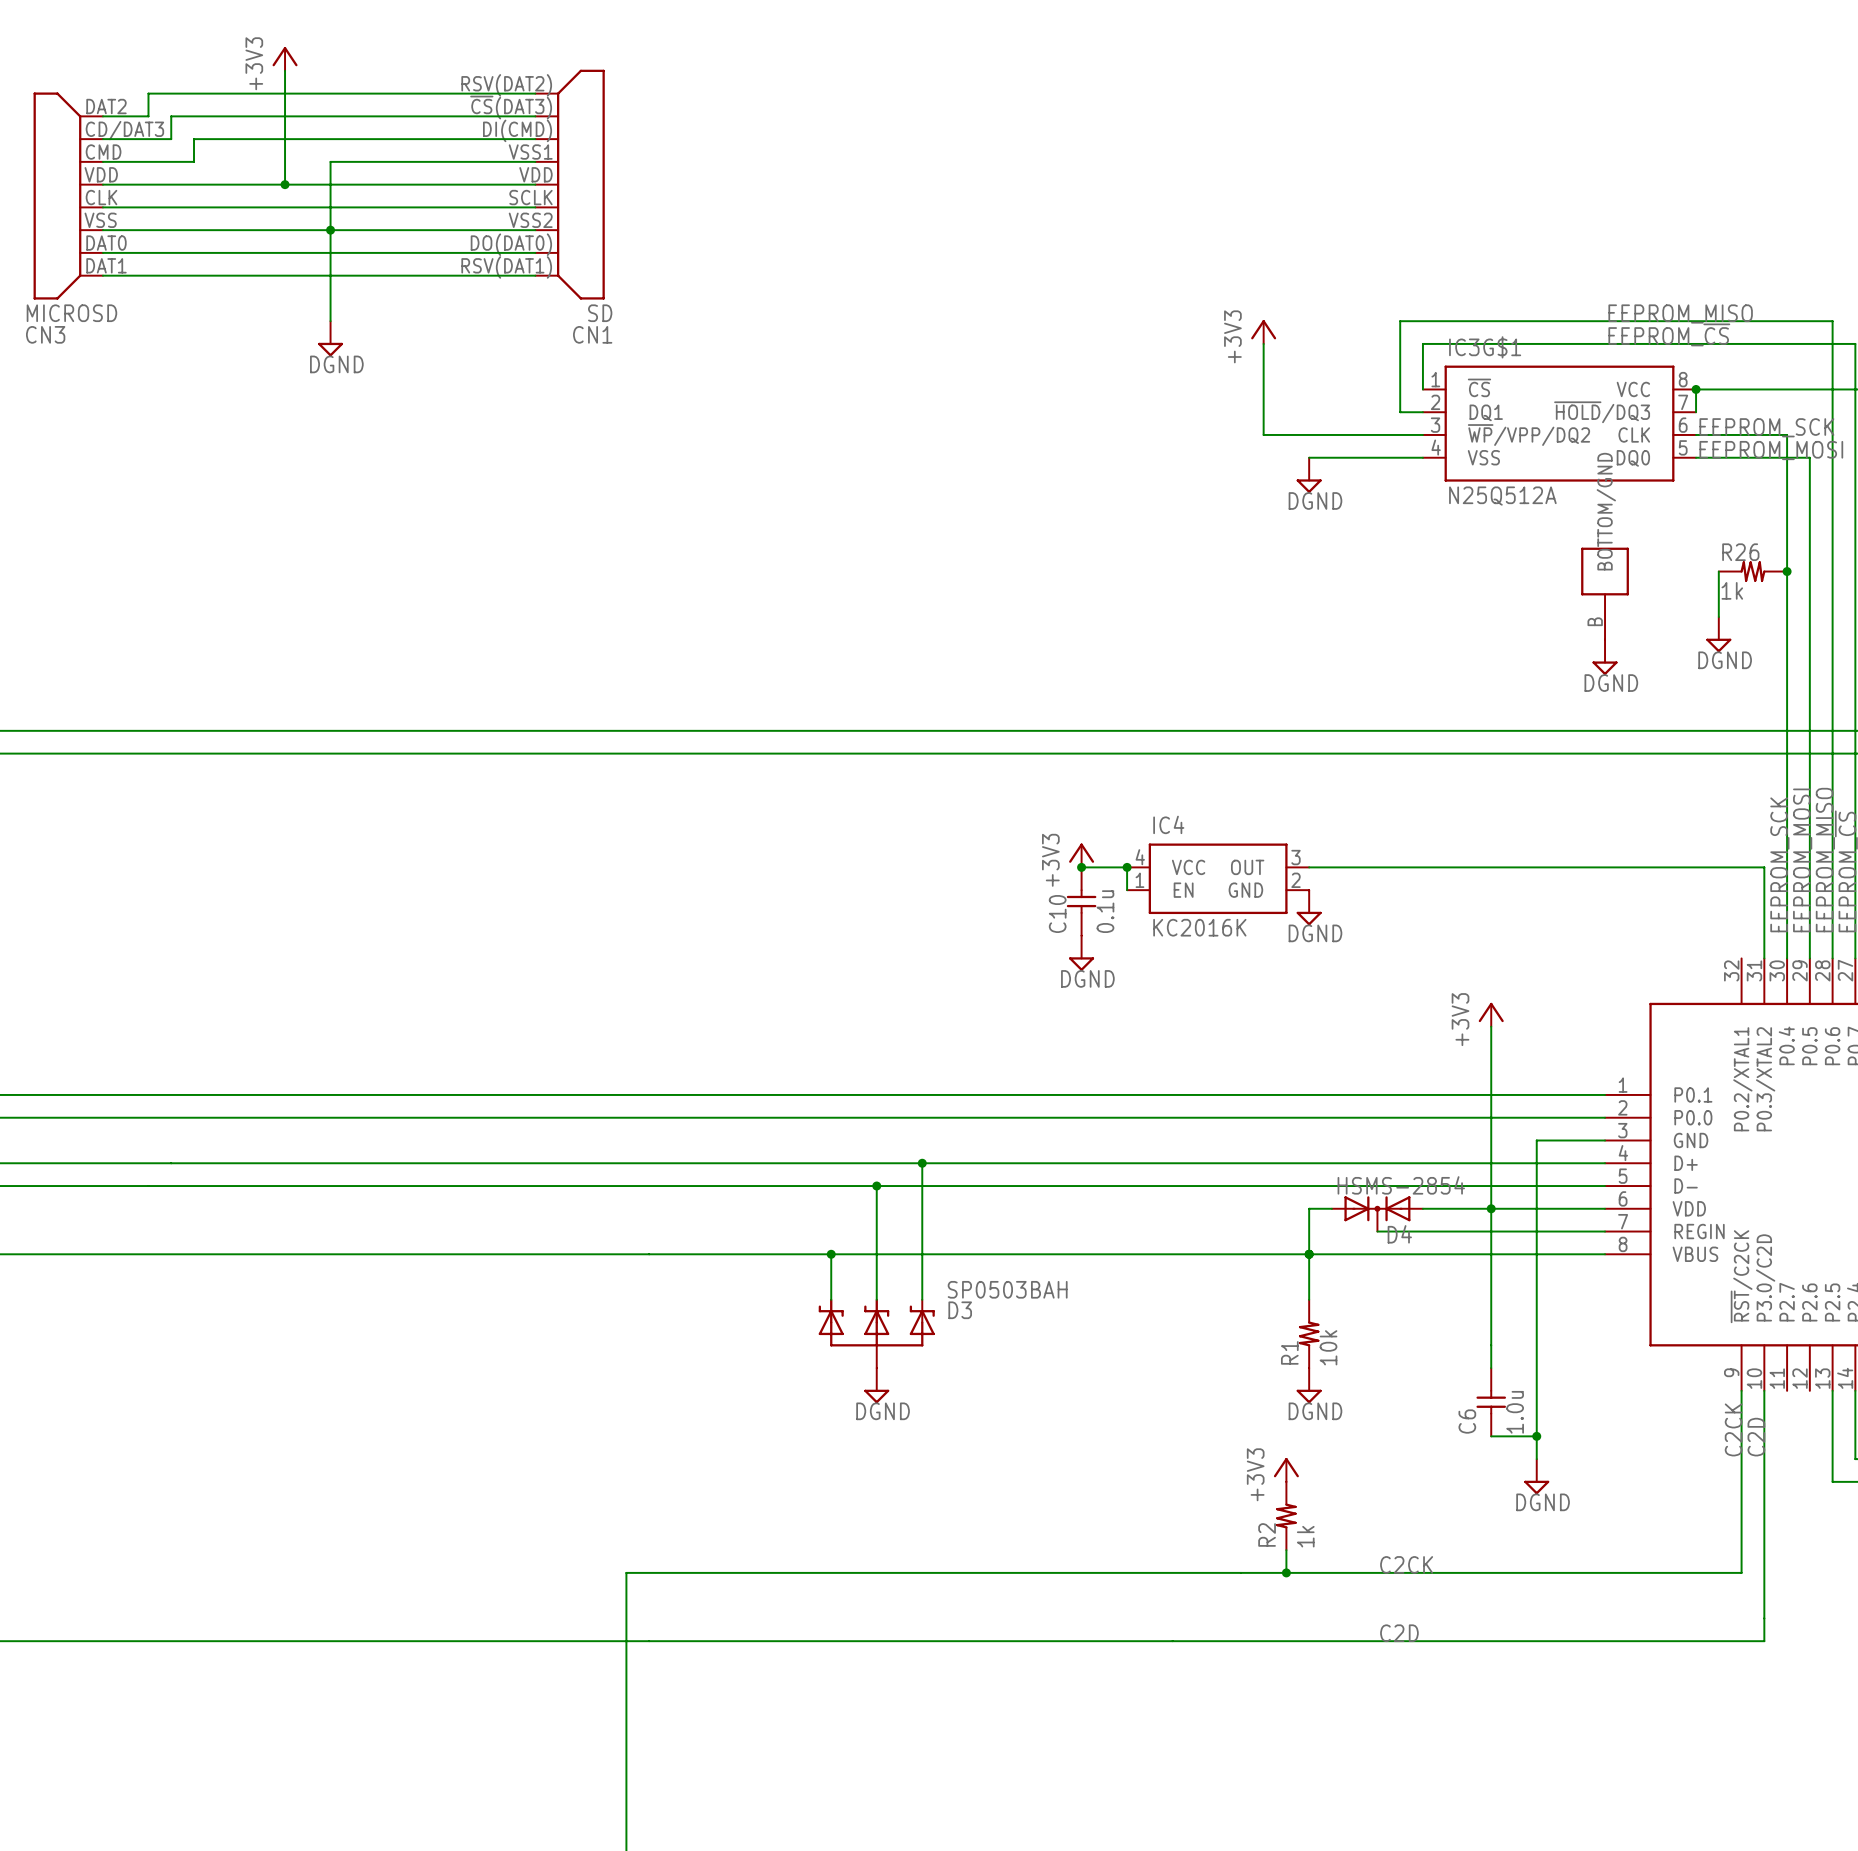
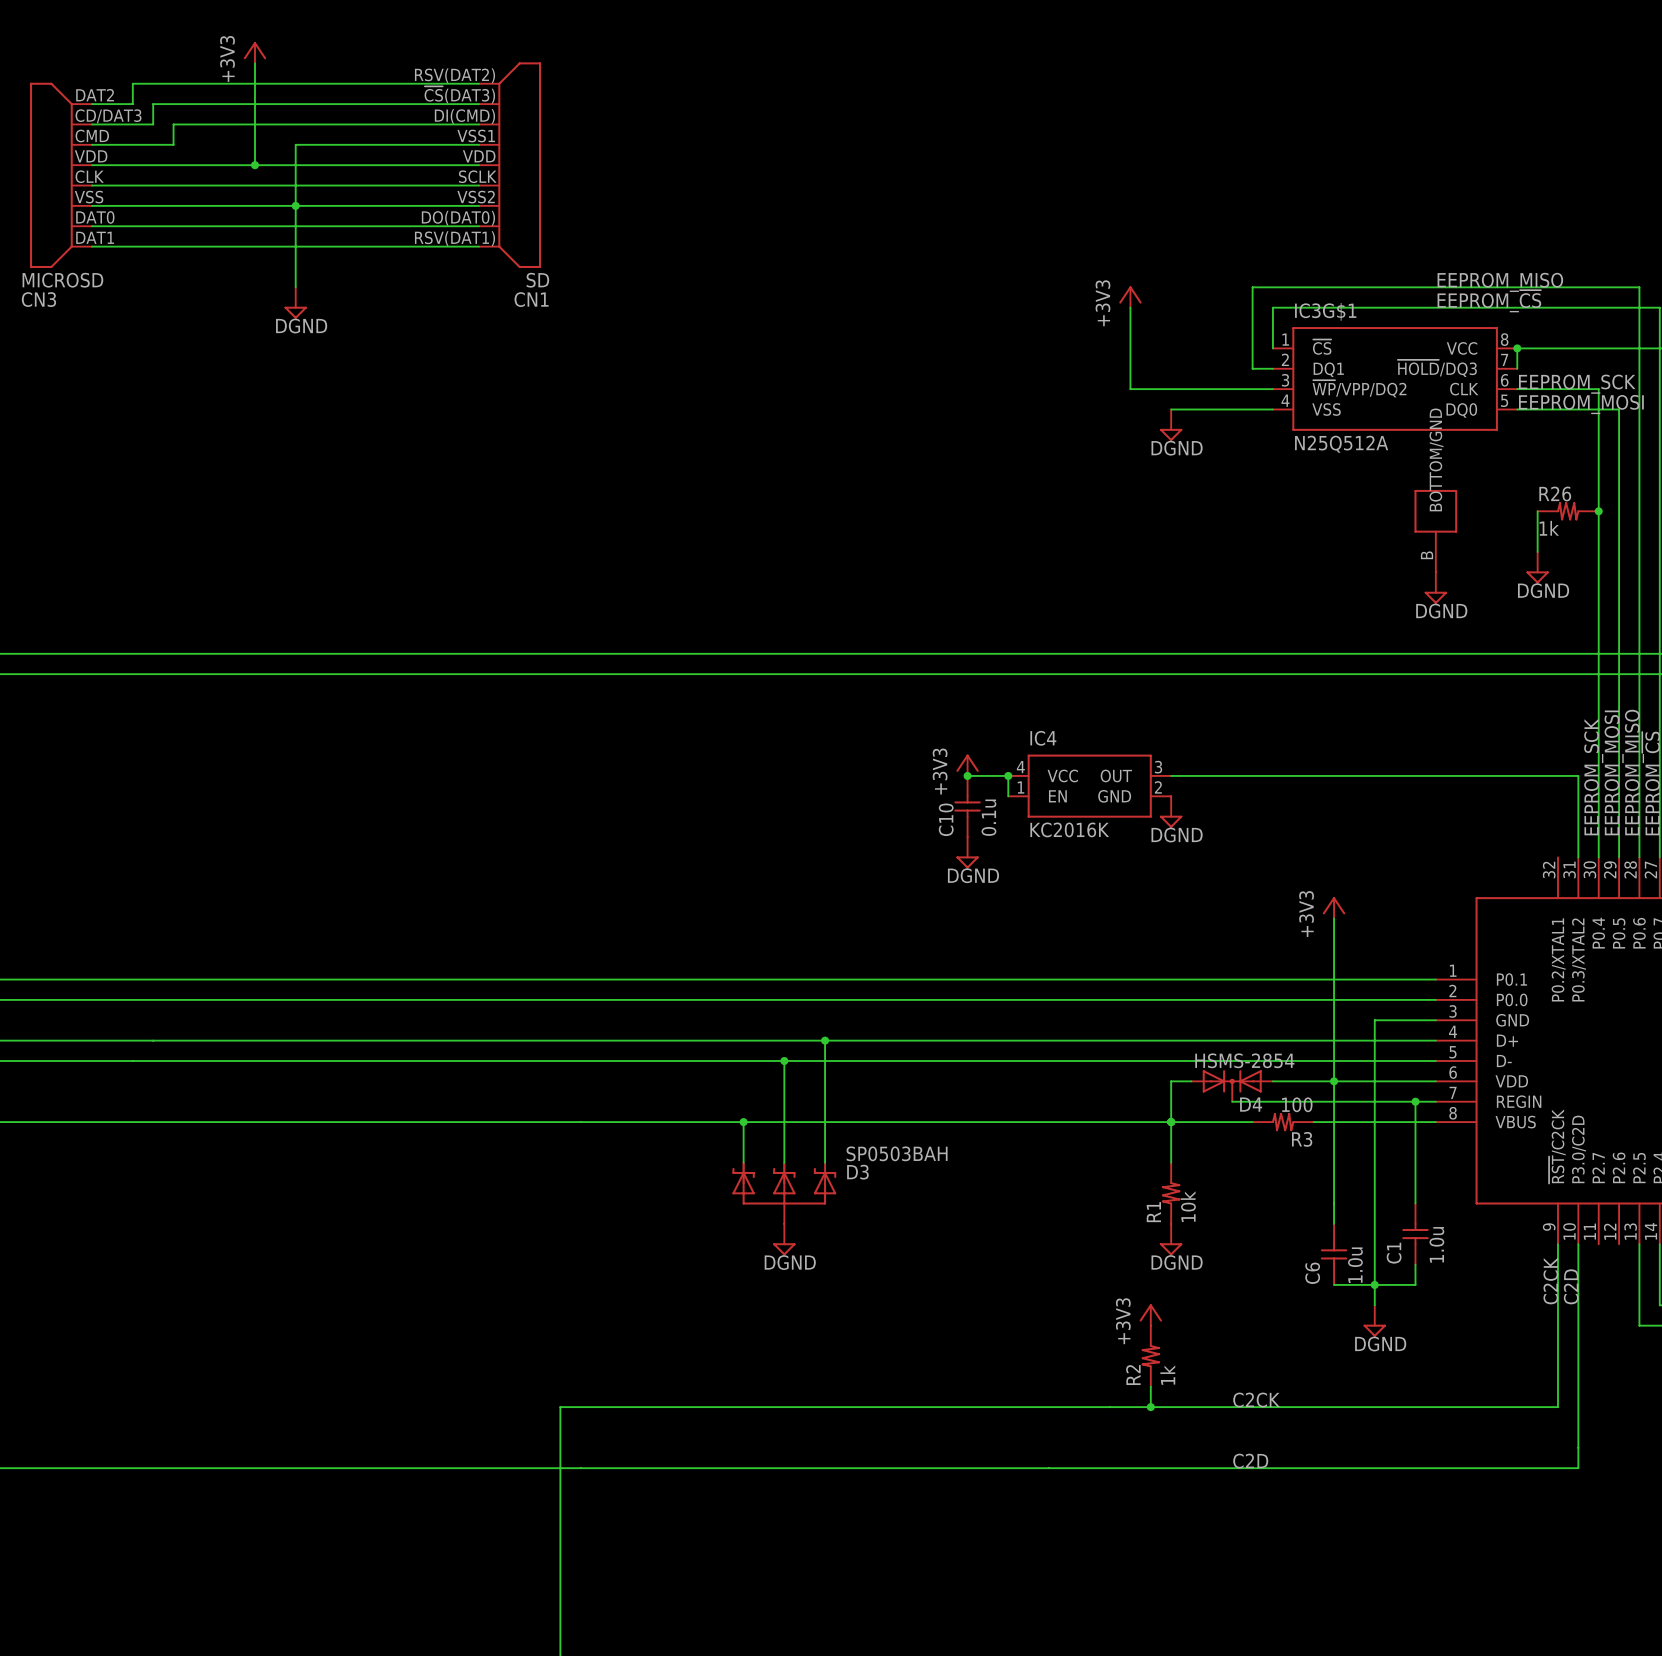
wire: none -> (1415, 1101) (1415, 1203)
junction: none -> (1415, 1101)
R3: none -> 100 (1283, 1122)
C1: none -> 1.0u (1415, 1234)
wire: none -> (1415, 1264) (1415, 1284) (1374, 1284)

